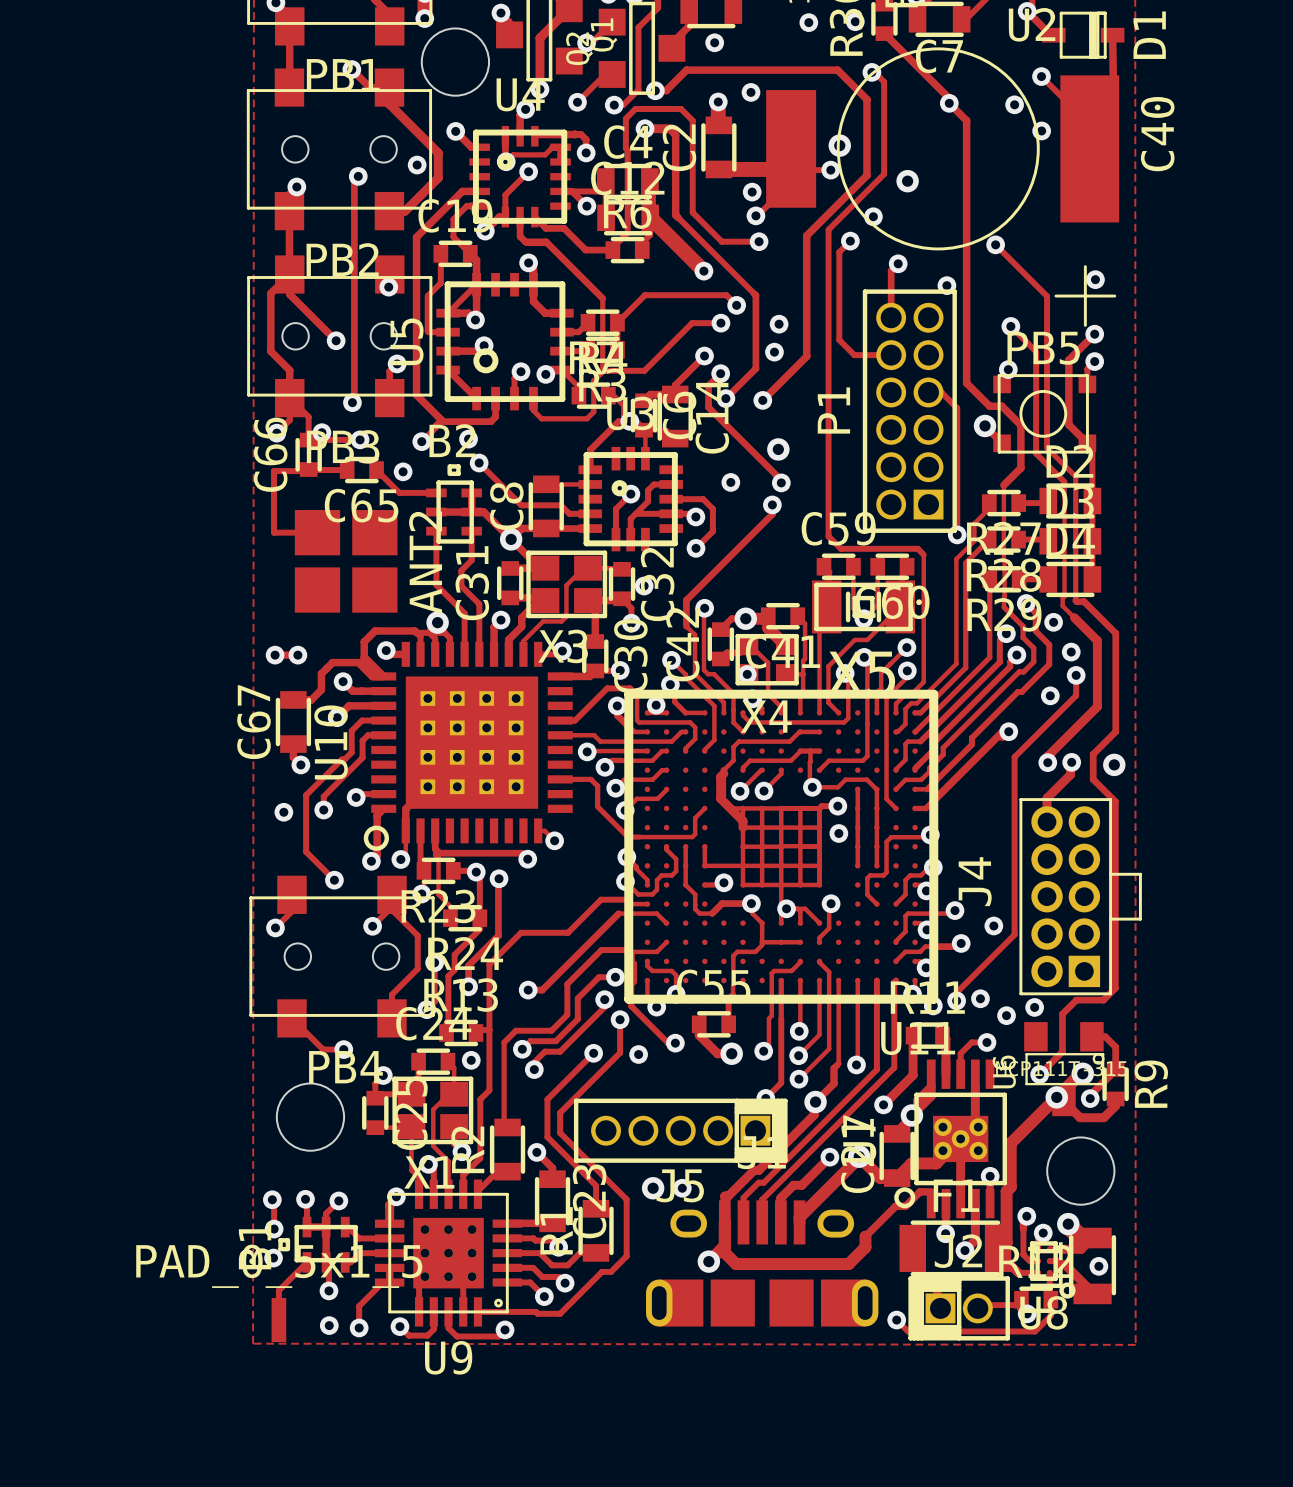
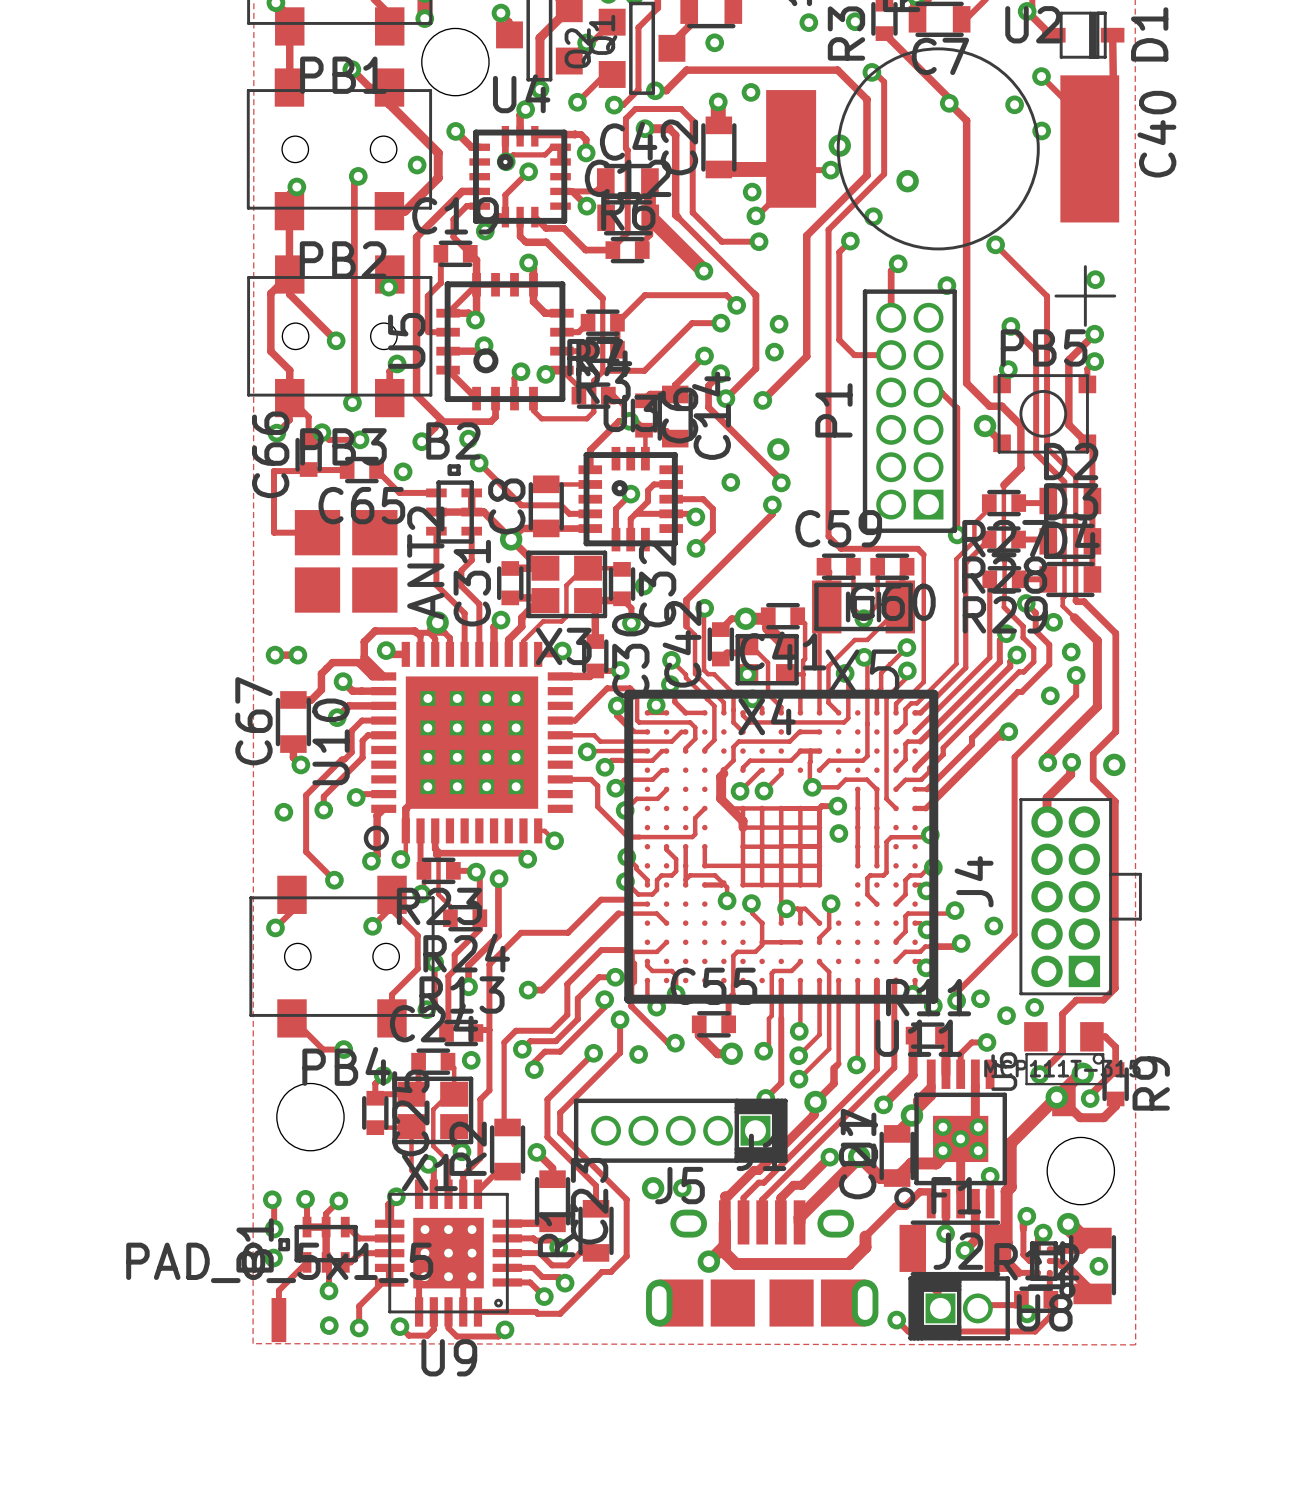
track: none -> (685, 879) (690, 875) (715, 875) (727, 887) (727, 900)
via position: (723, 882) -> (727, 900)
track: (685, 884) (695, 894) (695, 909) (699, 913) (712, 913) (722, 903) (751, 903) -> none

